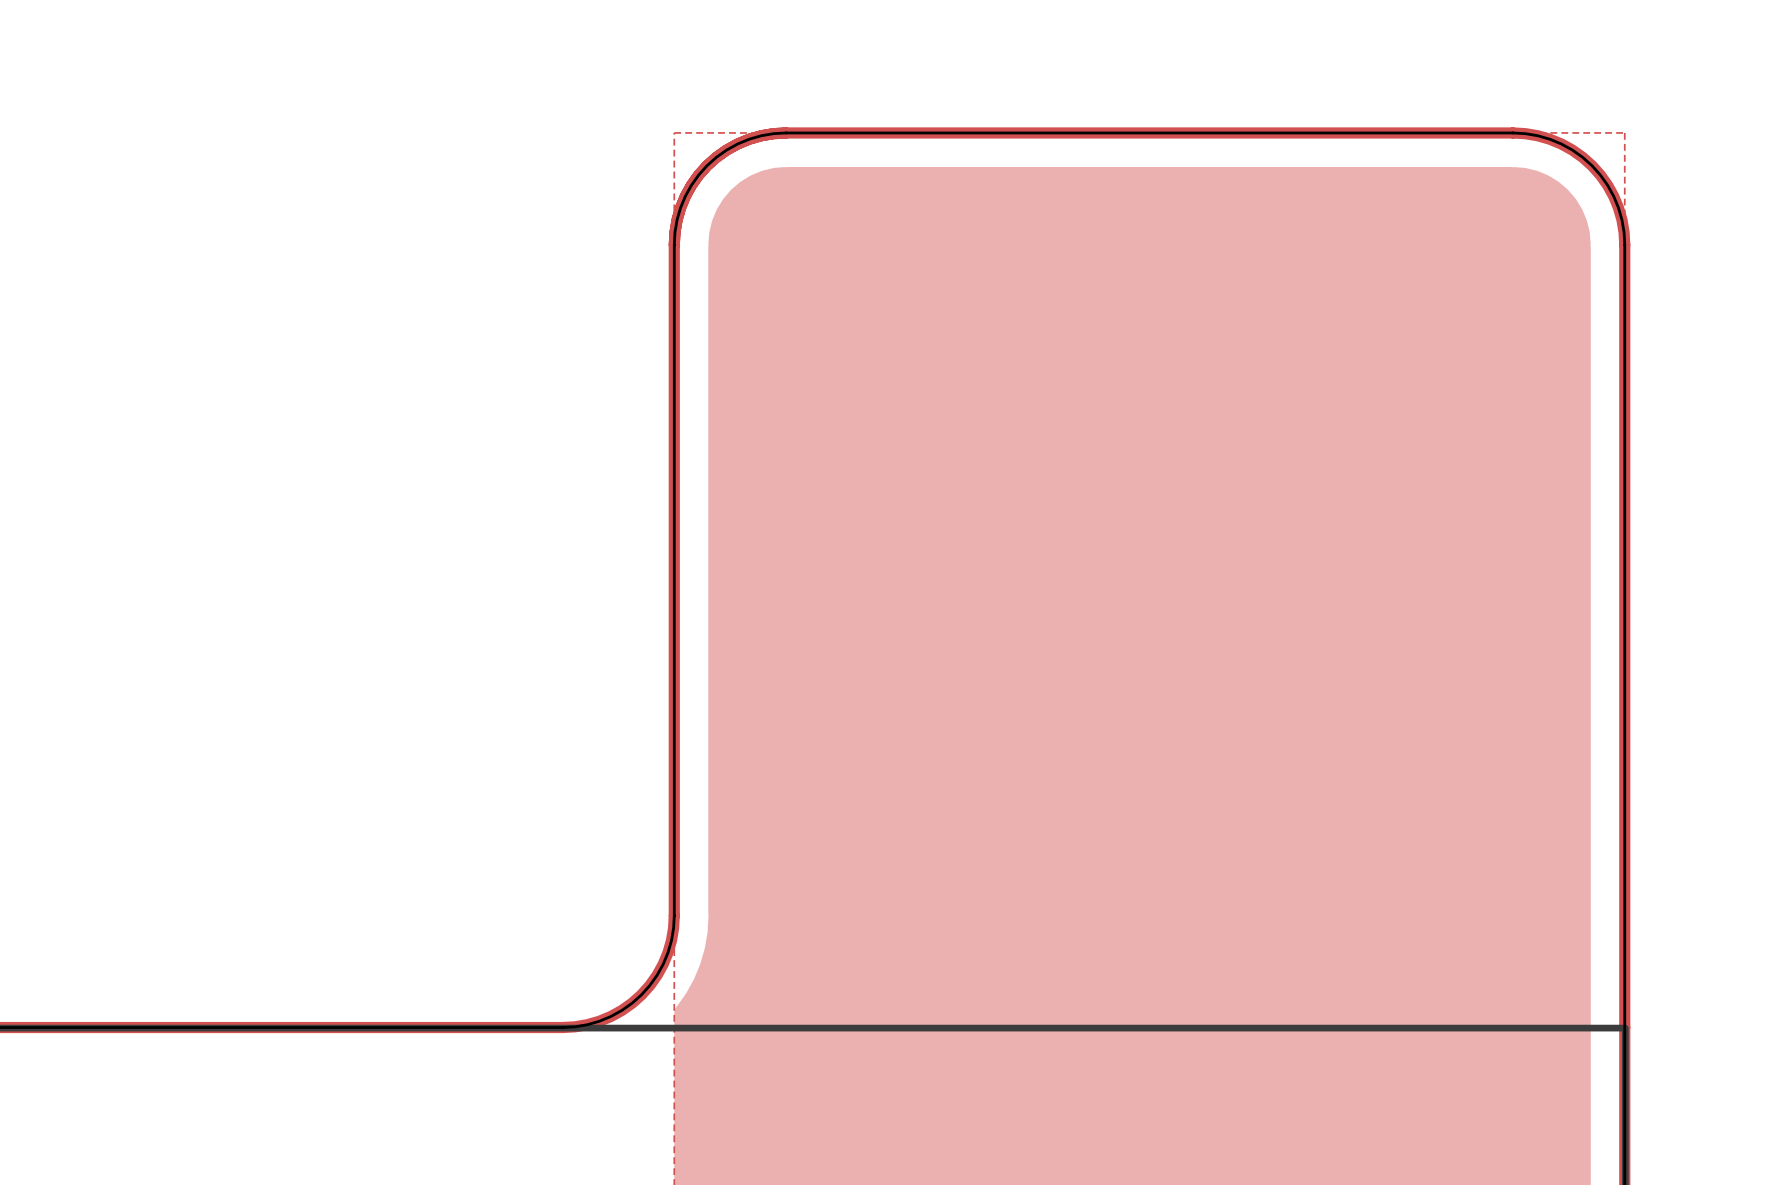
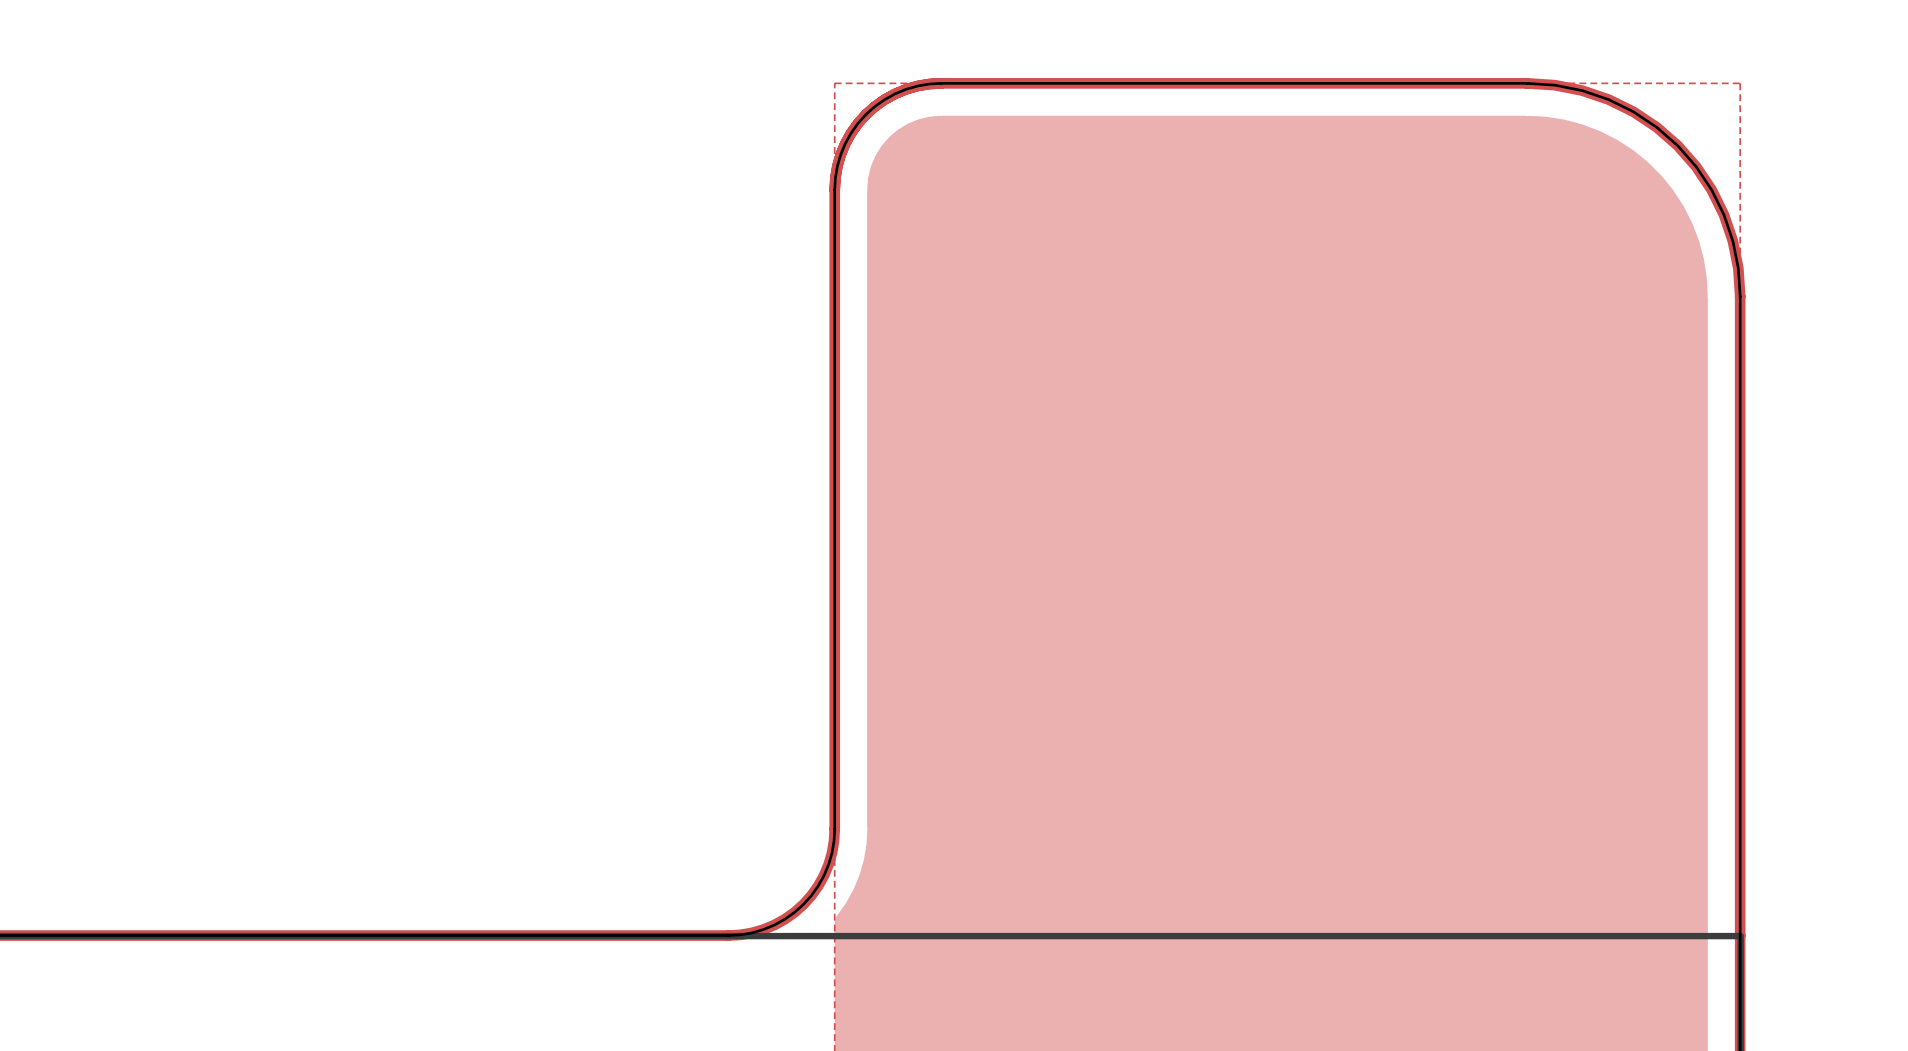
top track: (1401, 132) (1512, 132) (1537, 135) (1572, 150) (1592, 165) (1613, 196) (1621, 219) (1624, 244) (1624, 356) -> (1527, 83) (1554, 85) (1582, 90) (1608, 99) (1633, 111) (1656, 127) (1677, 145) (1696, 166) (1711, 189) (1723, 214) (1732, 241) (1738, 268) (1740, 296)
board edge: (1401, 132) (1512, 132) (1537, 135) (1572, 150) (1592, 165) (1613, 196) (1621, 219) (1624, 244) (1624, 356) -> (1527, 83) (1554, 85) (1582, 90) (1608, 99) (1633, 111) (1656, 127) (1677, 145) (1696, 166) (1711, 189) (1723, 214) (1732, 241) (1738, 268) (1740, 296)

